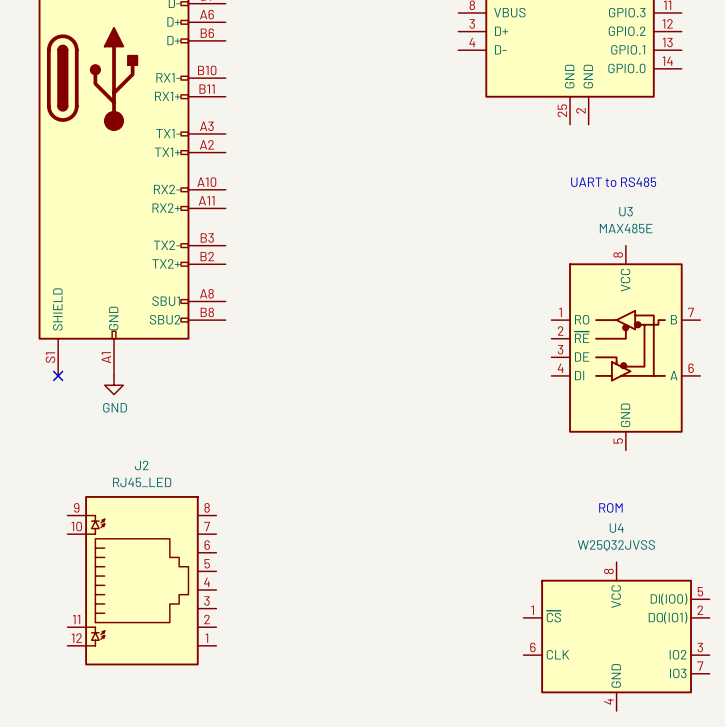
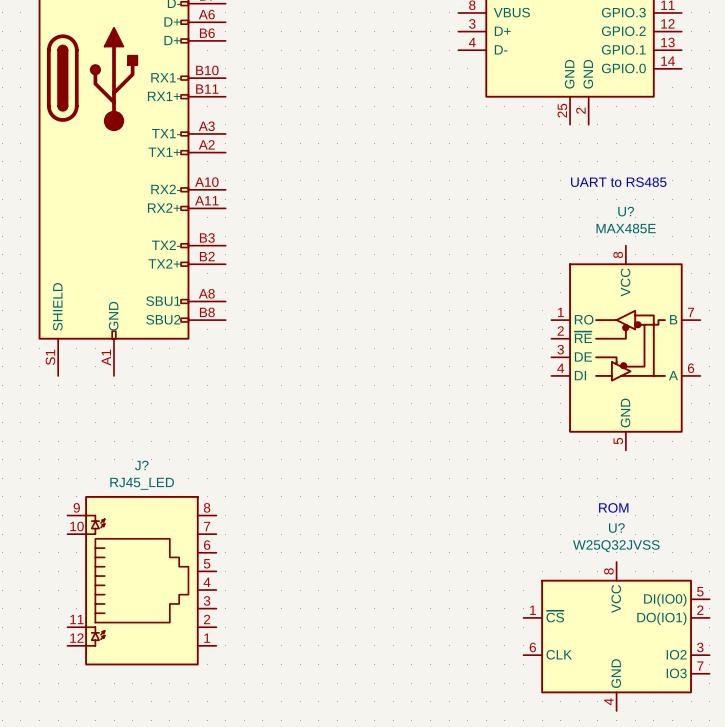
U3 name: U3 (626, 211) -> U? (626, 211)
no-connect mark: (58, 375) -> none
power symbol: GND (114, 385) -> none
J2 name: J2 (141, 465) -> J? (141, 465)
U4 name: U4 (616, 528) -> U? (616, 528)

